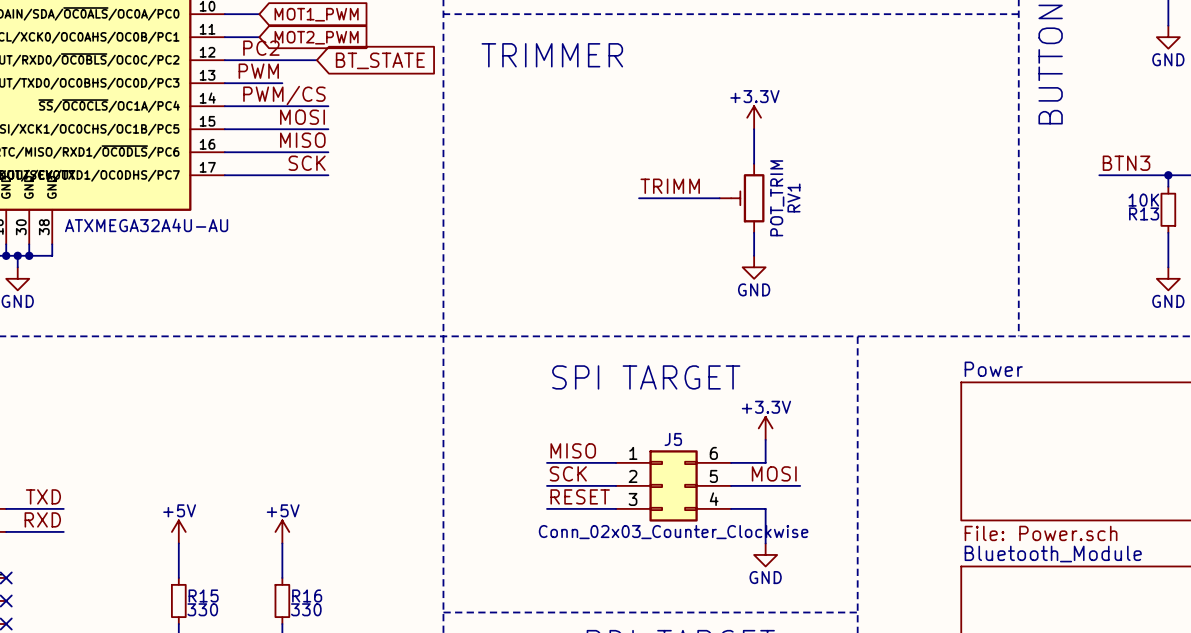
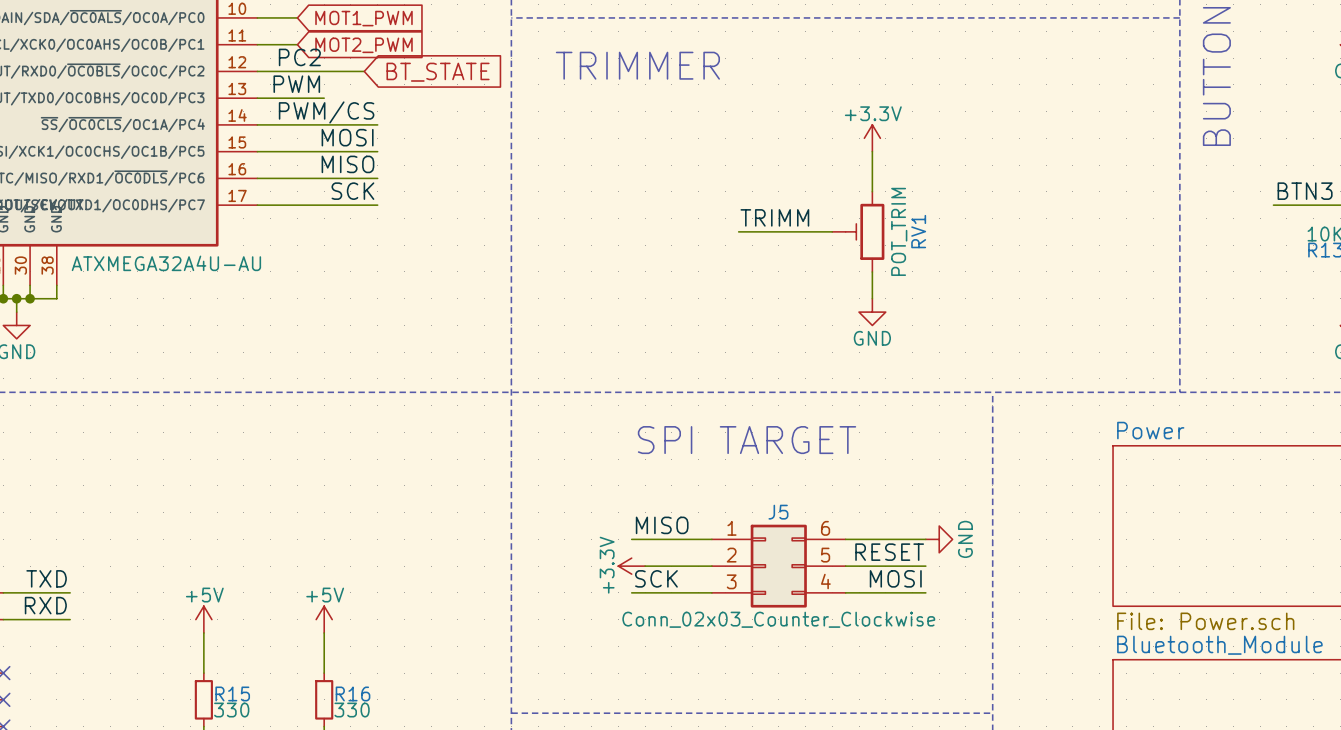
power symbol: +3.3V (765, 428) -> none
wire: (765, 439) (765, 462) -> (925, 539) (885, 539)
label: SCK (568, 473) -> none
label: MOSI (774, 473) -> RESET (889, 552)
power symbol: none -> +3.3V (631, 566)
label: RESET (580, 496) -> SCK (656, 578)
label: none -> MOSI (895, 578)
wire: (765, 508) (765, 543) -> (885, 592) (925, 592)
power symbol rotation: 0° (765, 554) -> 90° counterclockwise (939, 539)
power symbol position: GND (765, 554) -> GND (939, 539)

